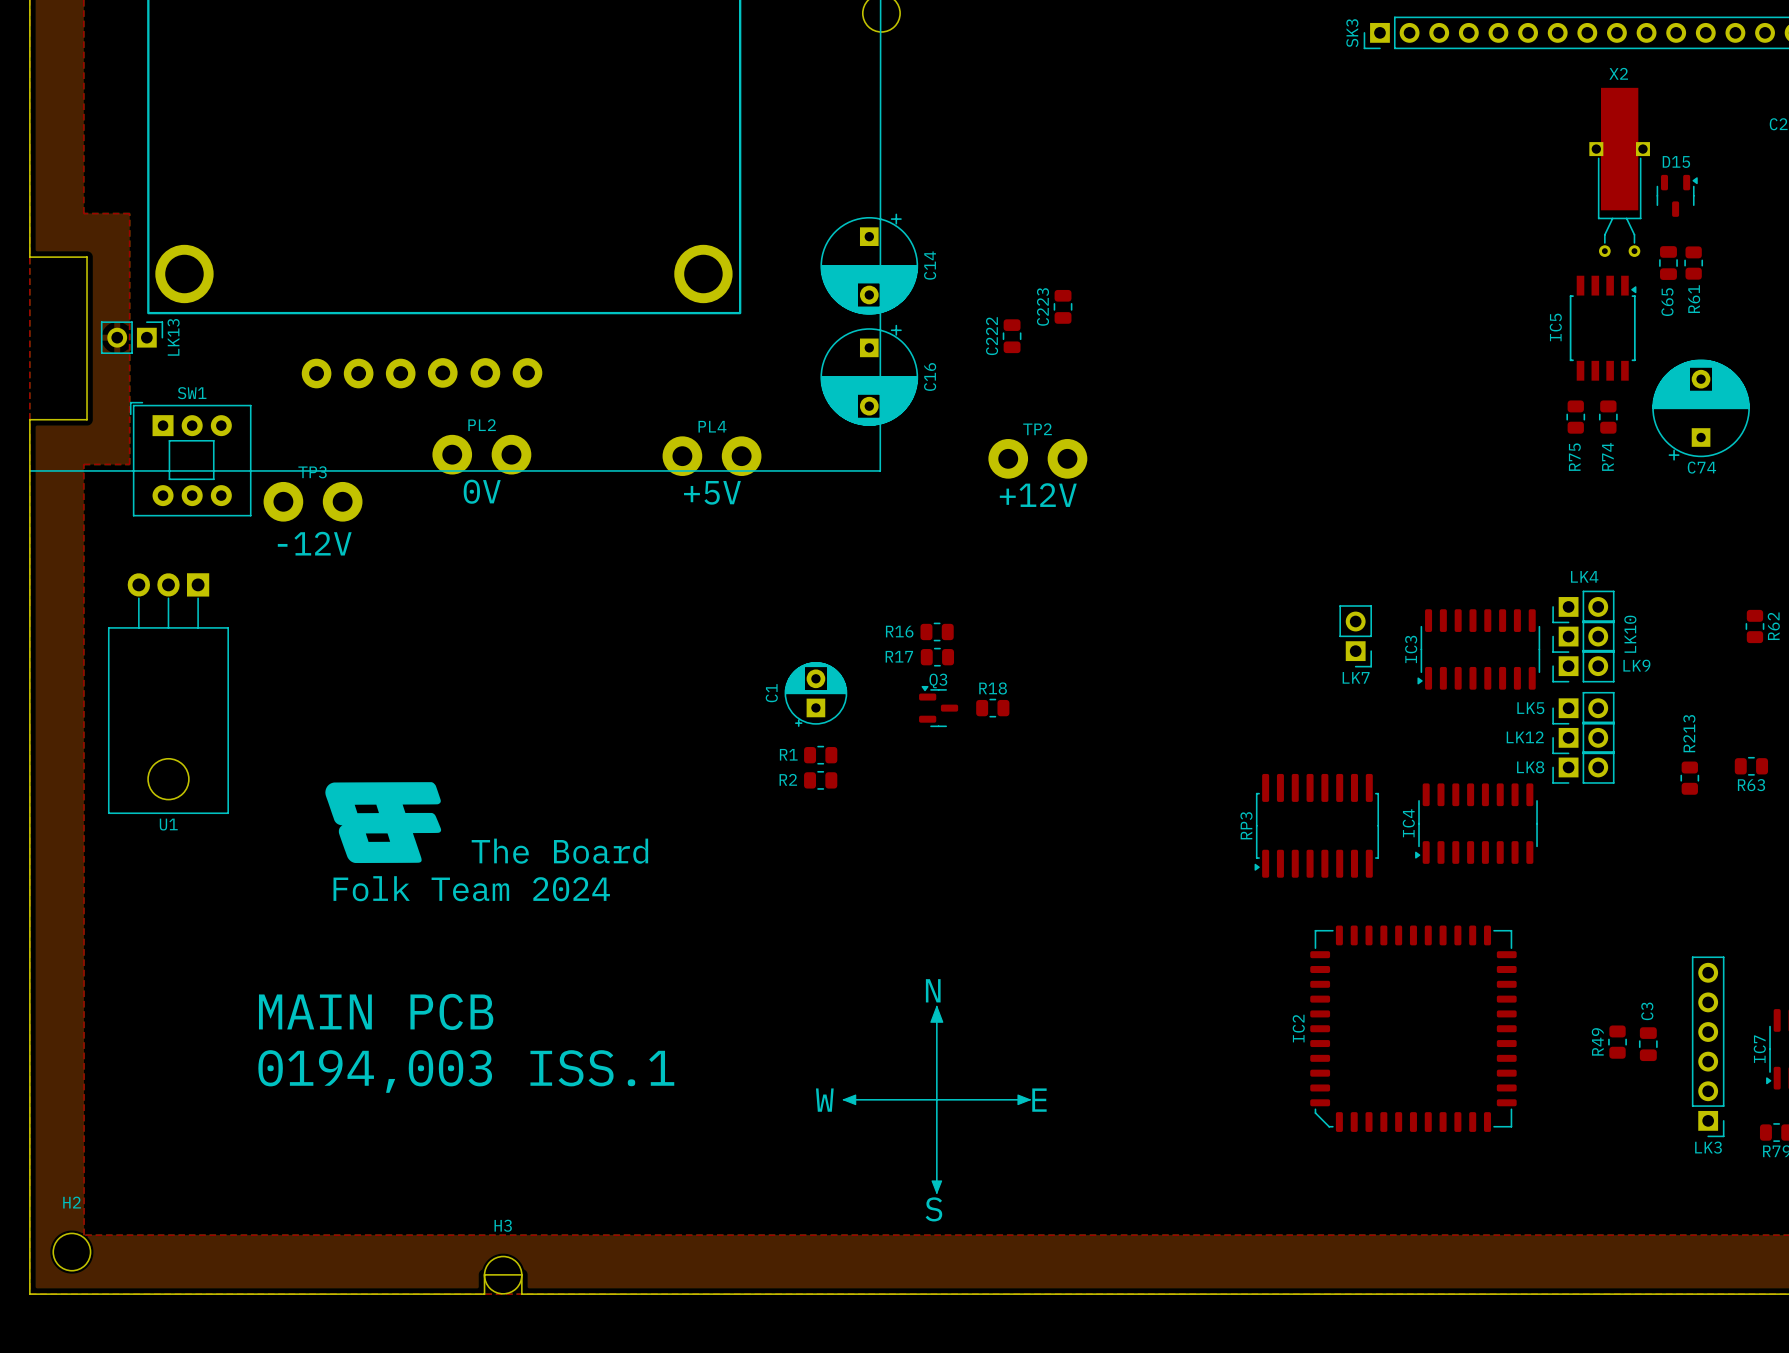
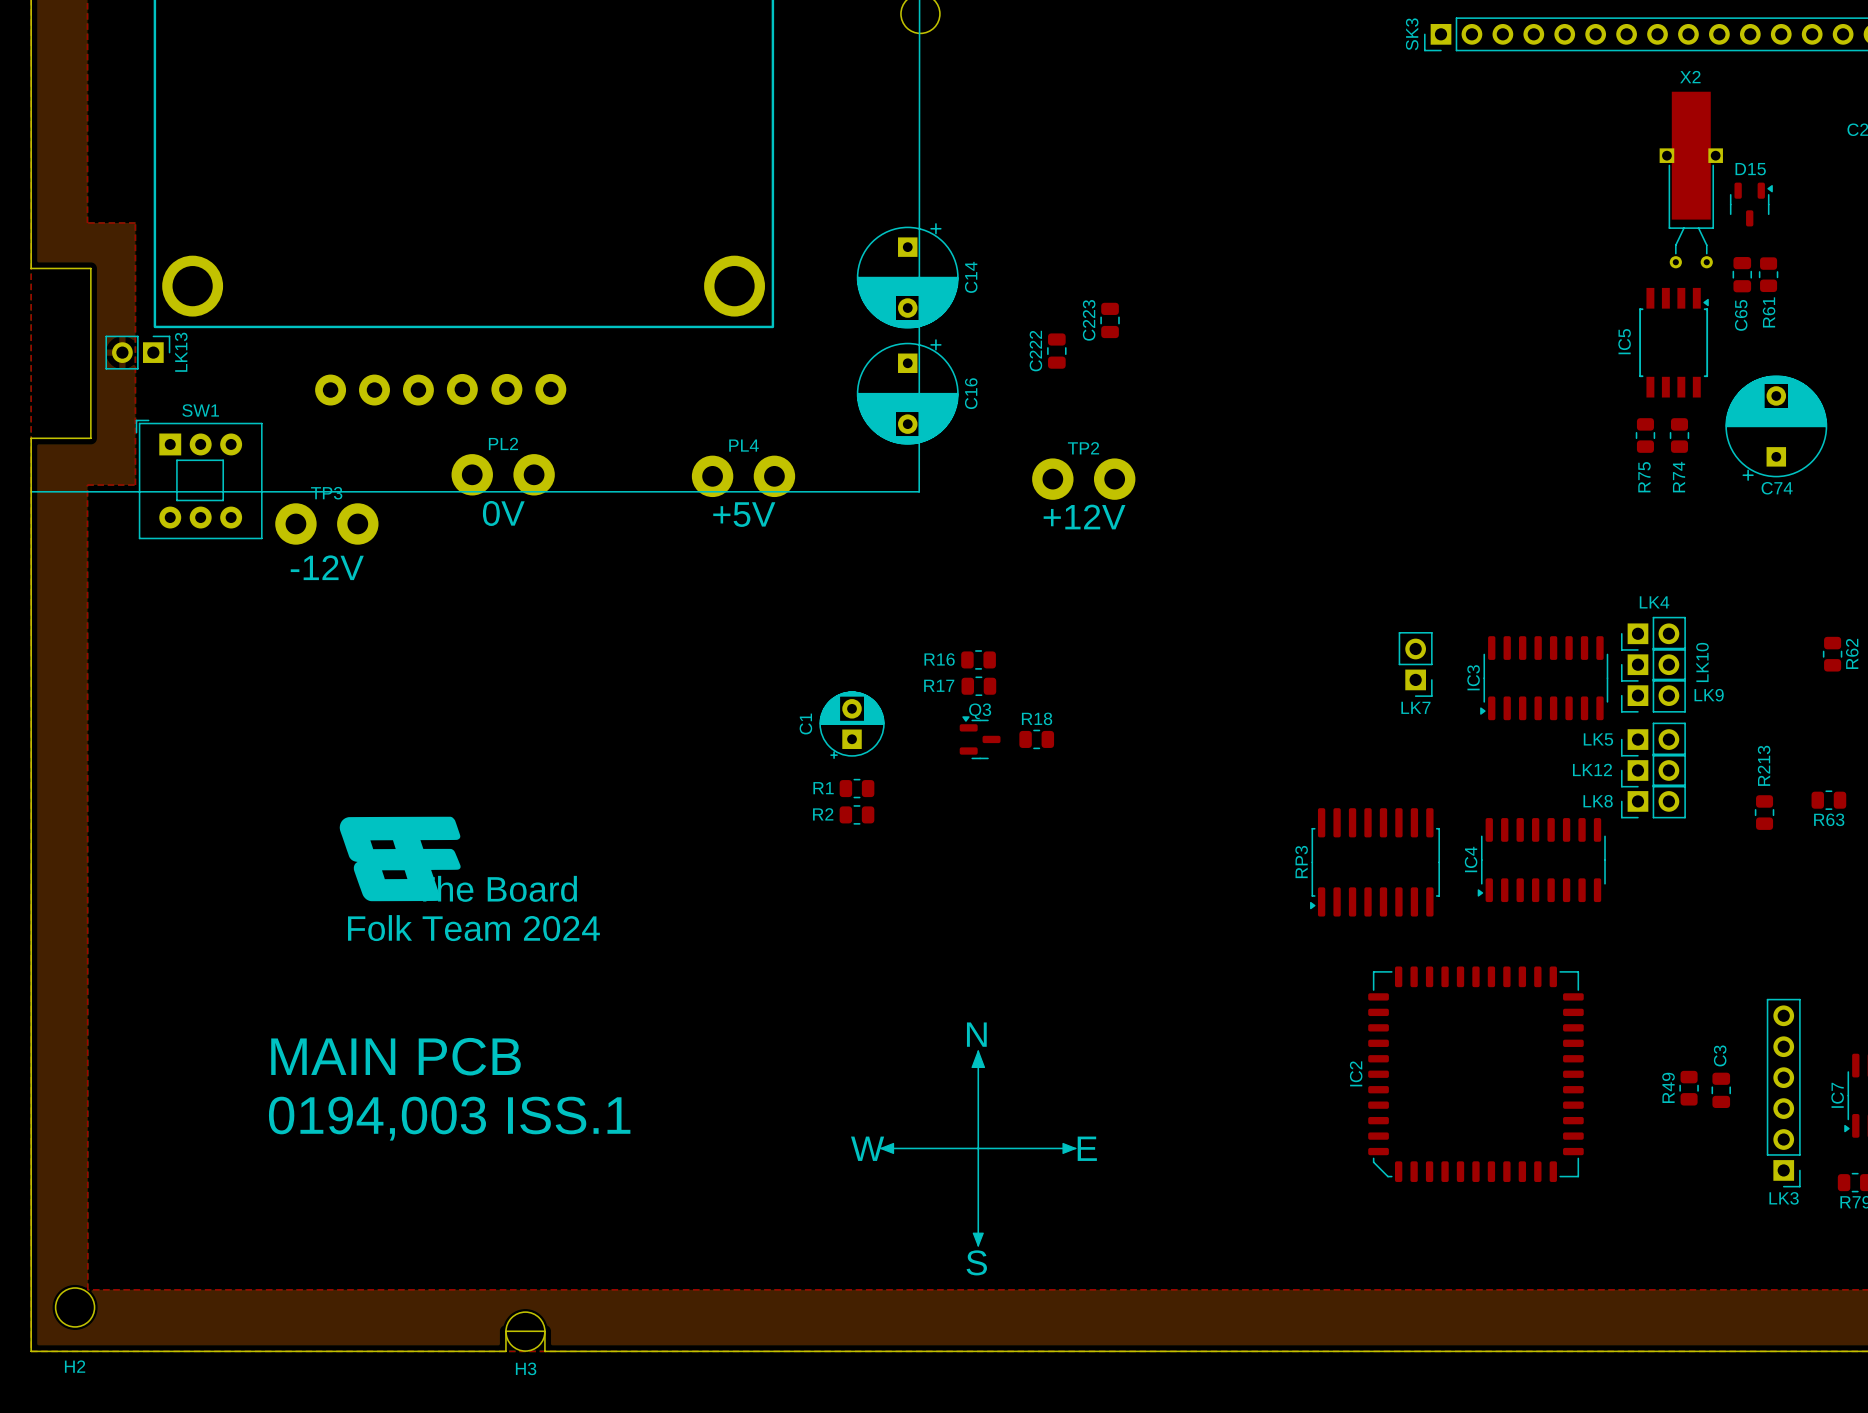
U1: (168, 693) -> none
H2 name position: H2 (72, 1202) -> H2 (75, 1366)
H3 name position: H3 (503, 1225) -> H3 (526, 1368)

